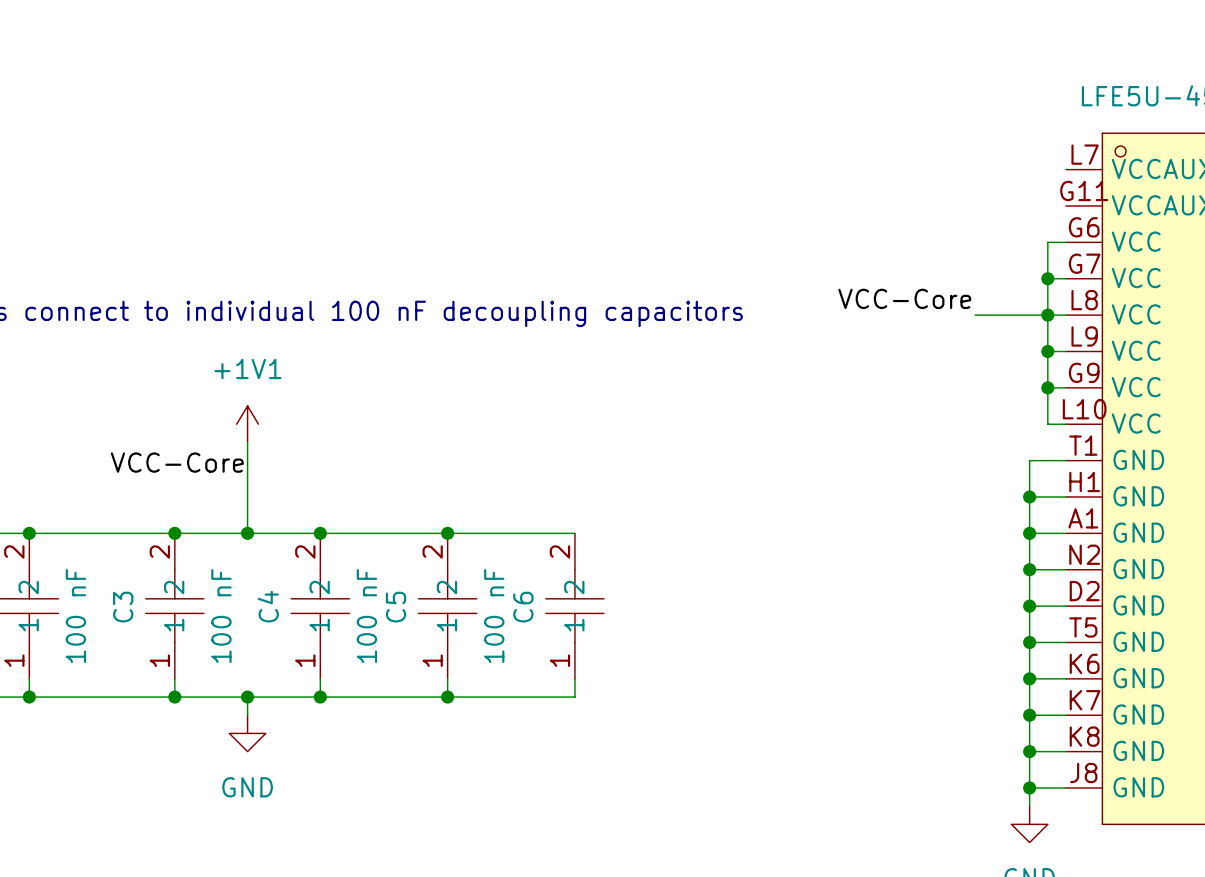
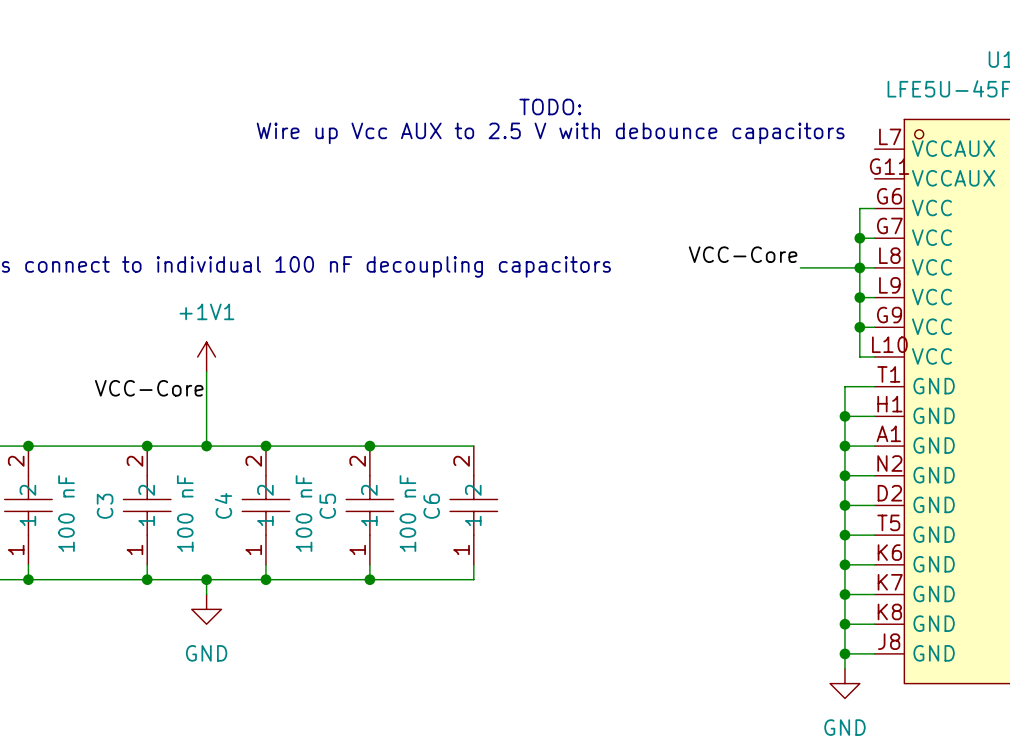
text: none -> TODO: (550, 106)
text: none -> Wire up Vcc AUX to 2.5 V with debounce capacitors (550, 133)

